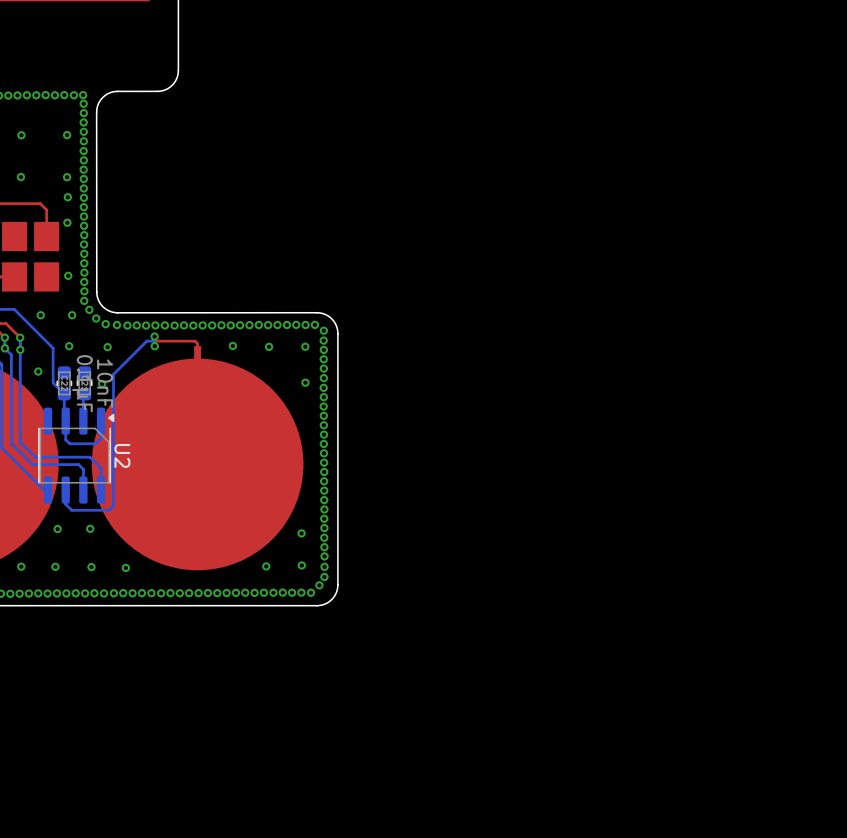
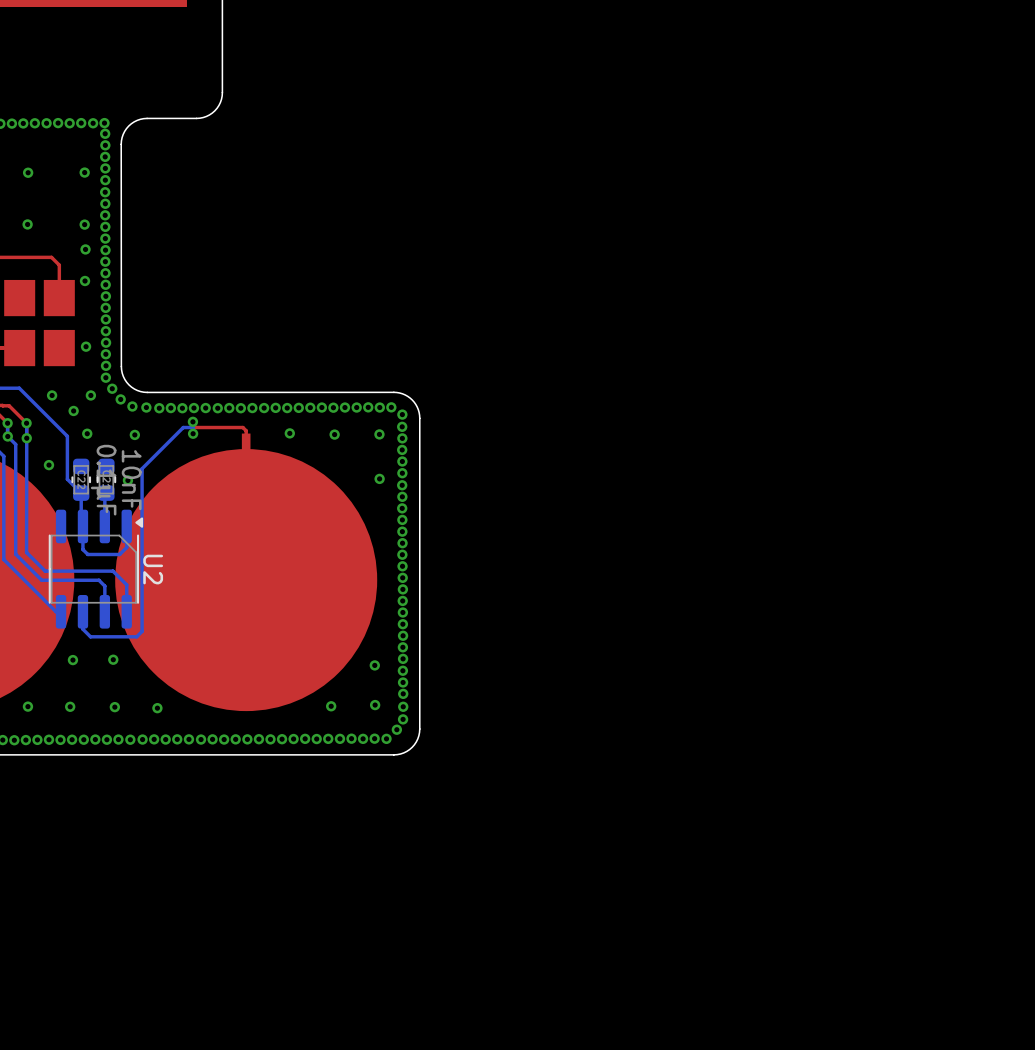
via: none -> (73, 410)

